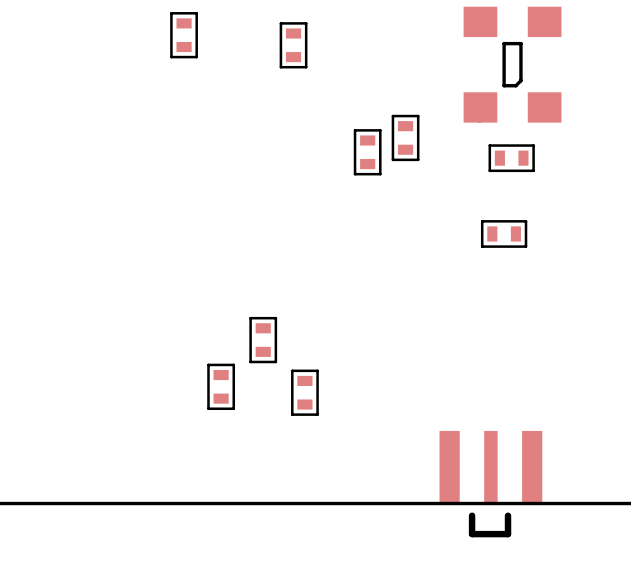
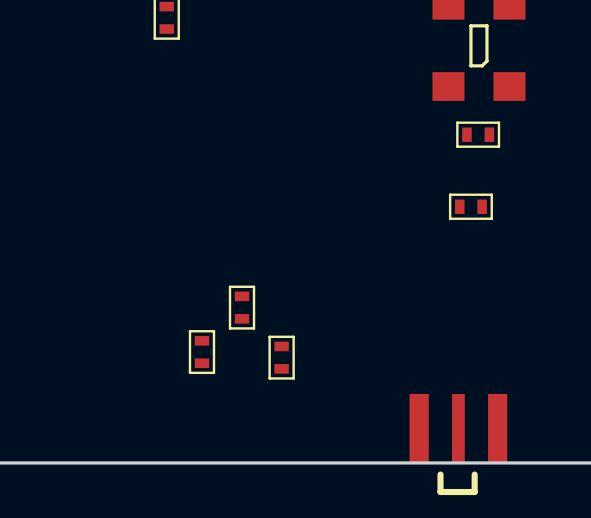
part: (293, 45) -> none
part: (405, 137) -> none
part: (367, 152) -> none

